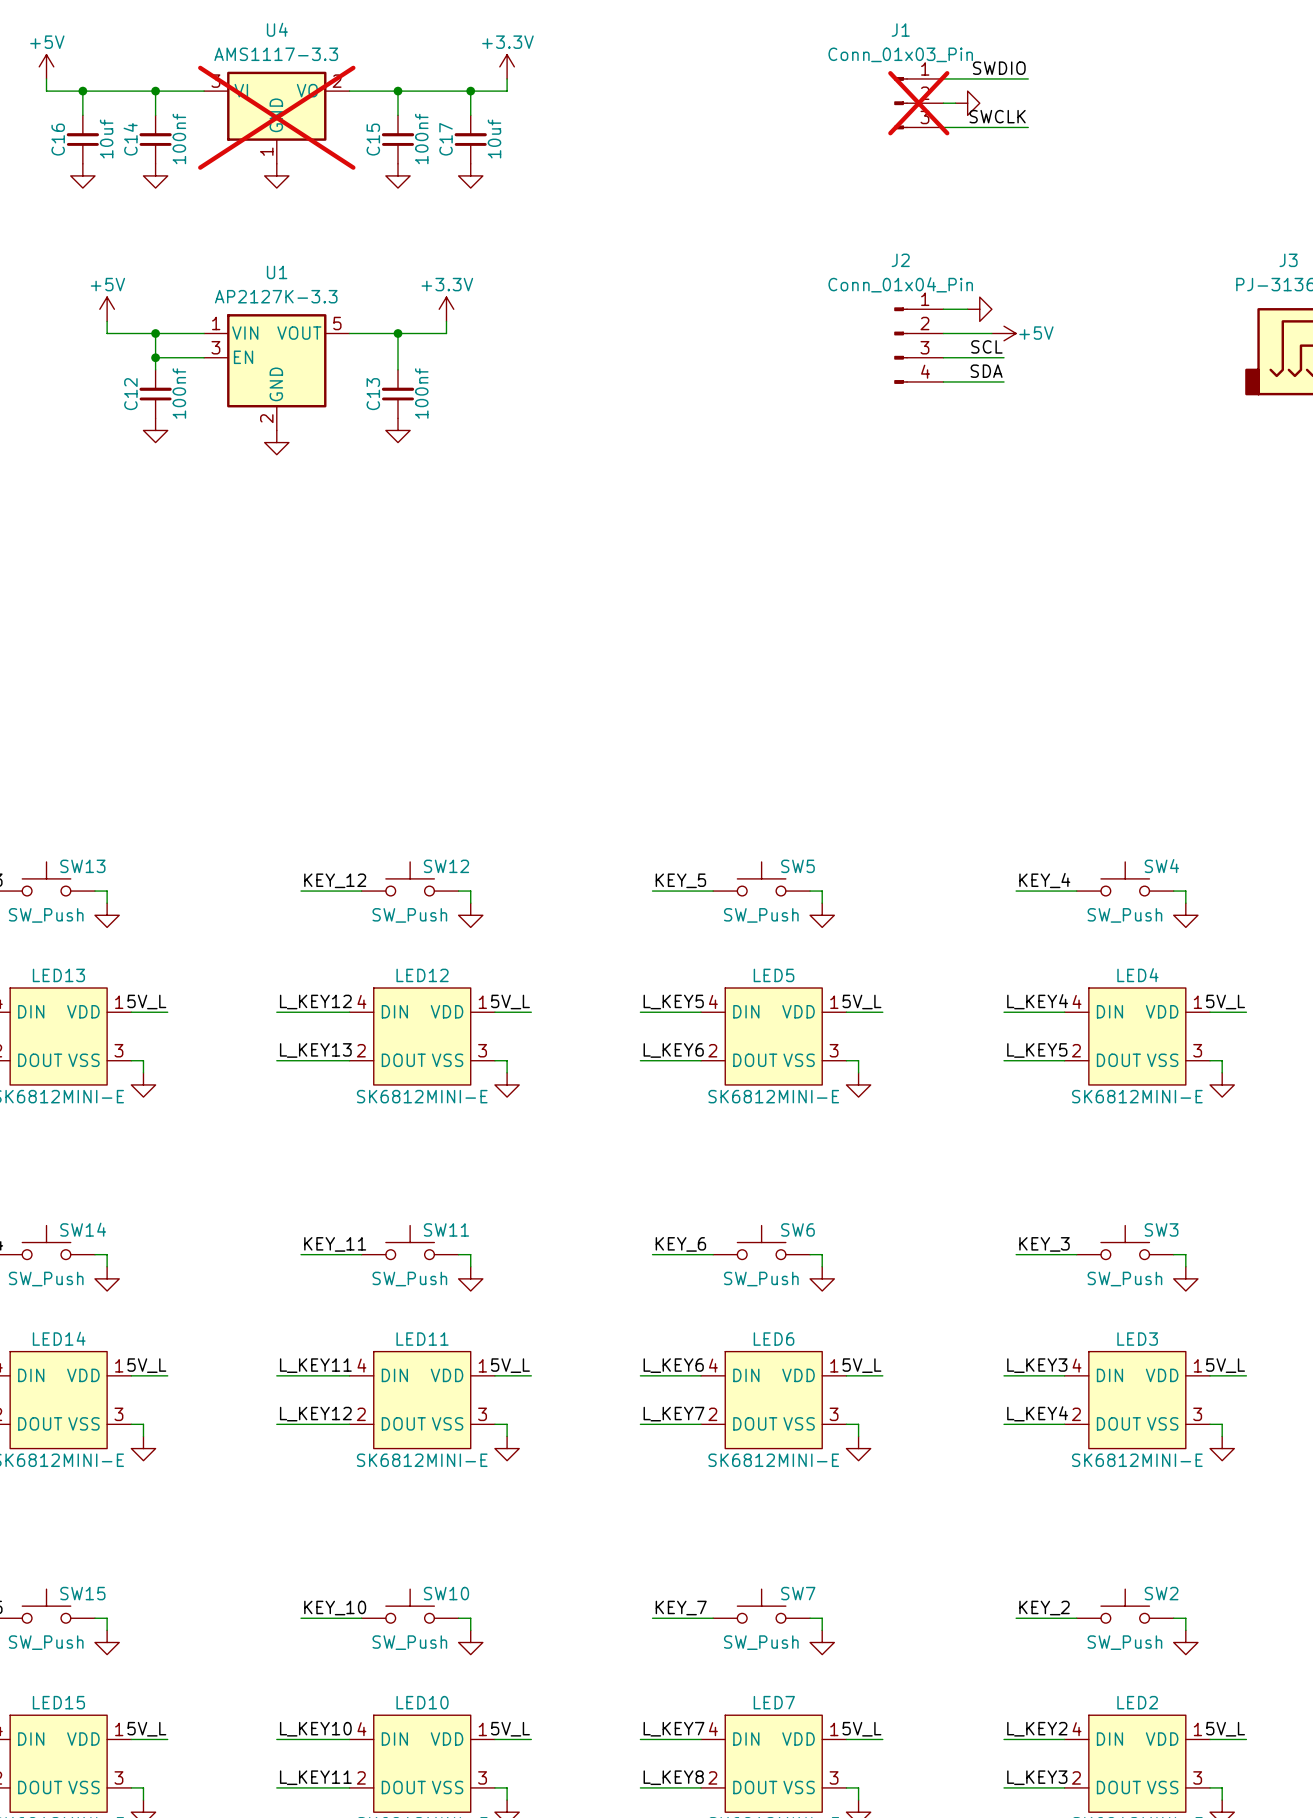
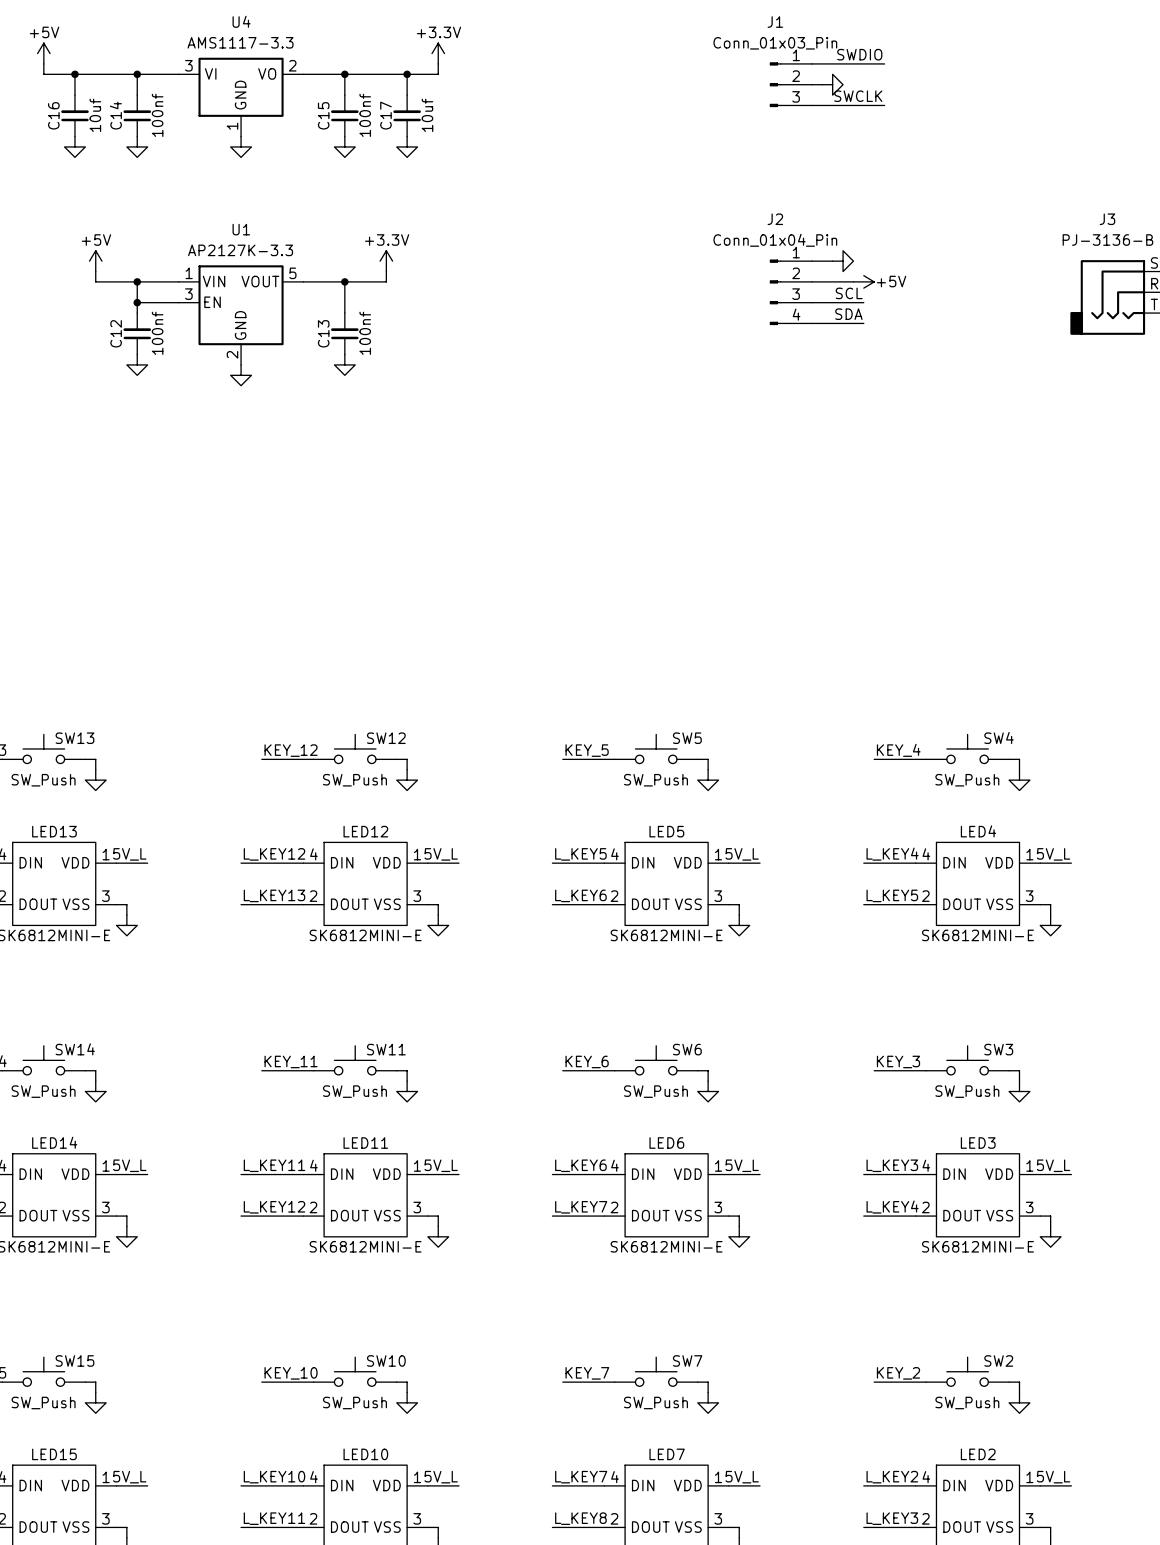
J1 do-not-place cross: (918, 103) -> none
U4 do-not-place cross: (276, 117) -> none

